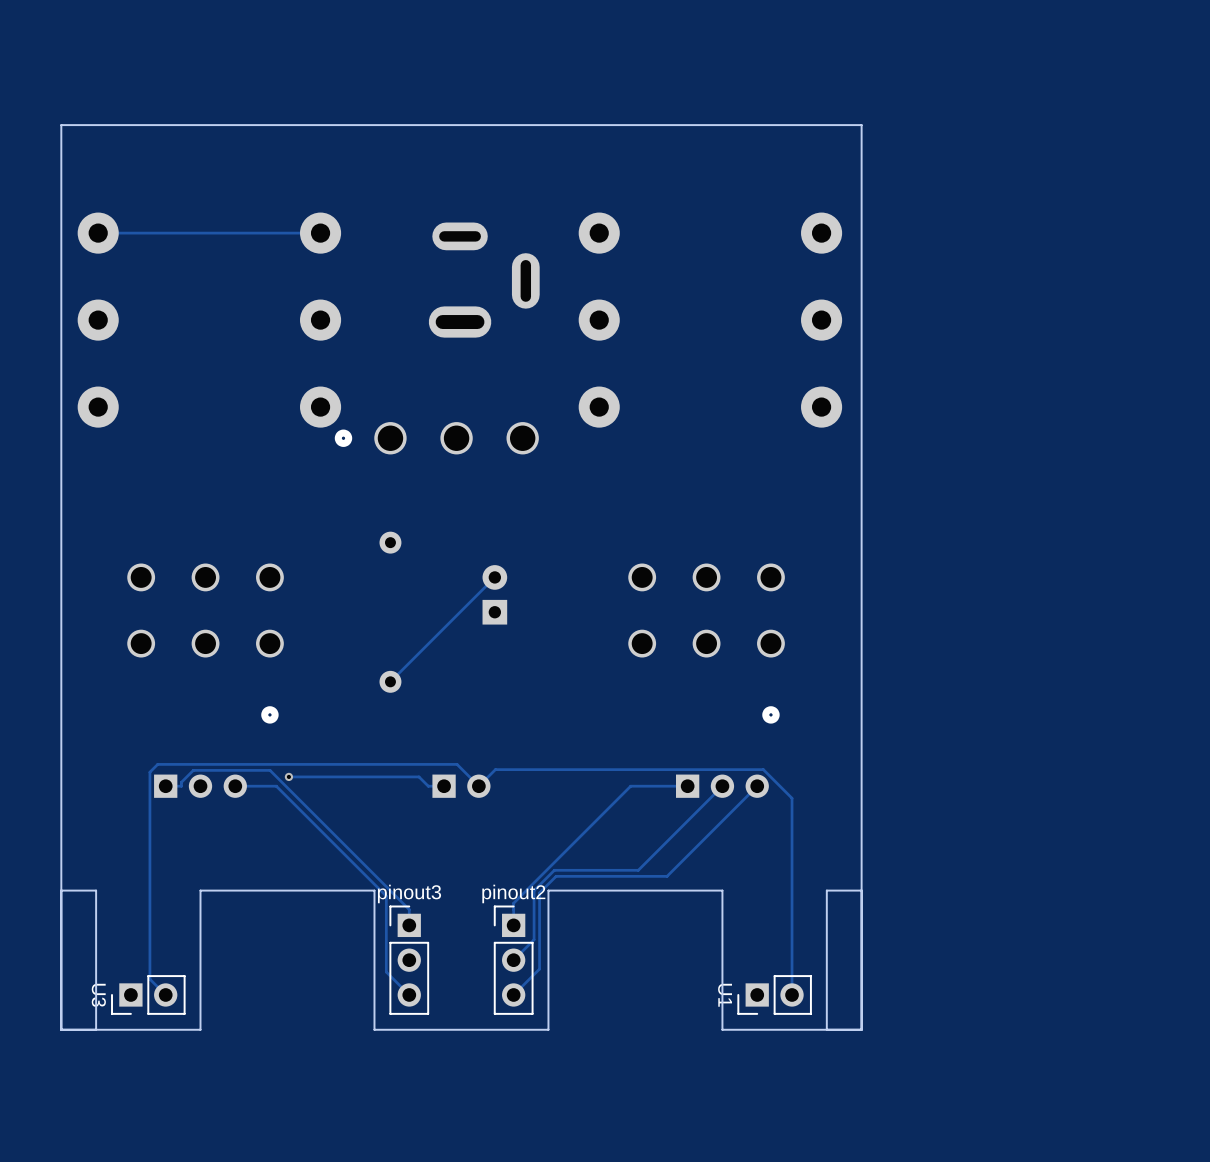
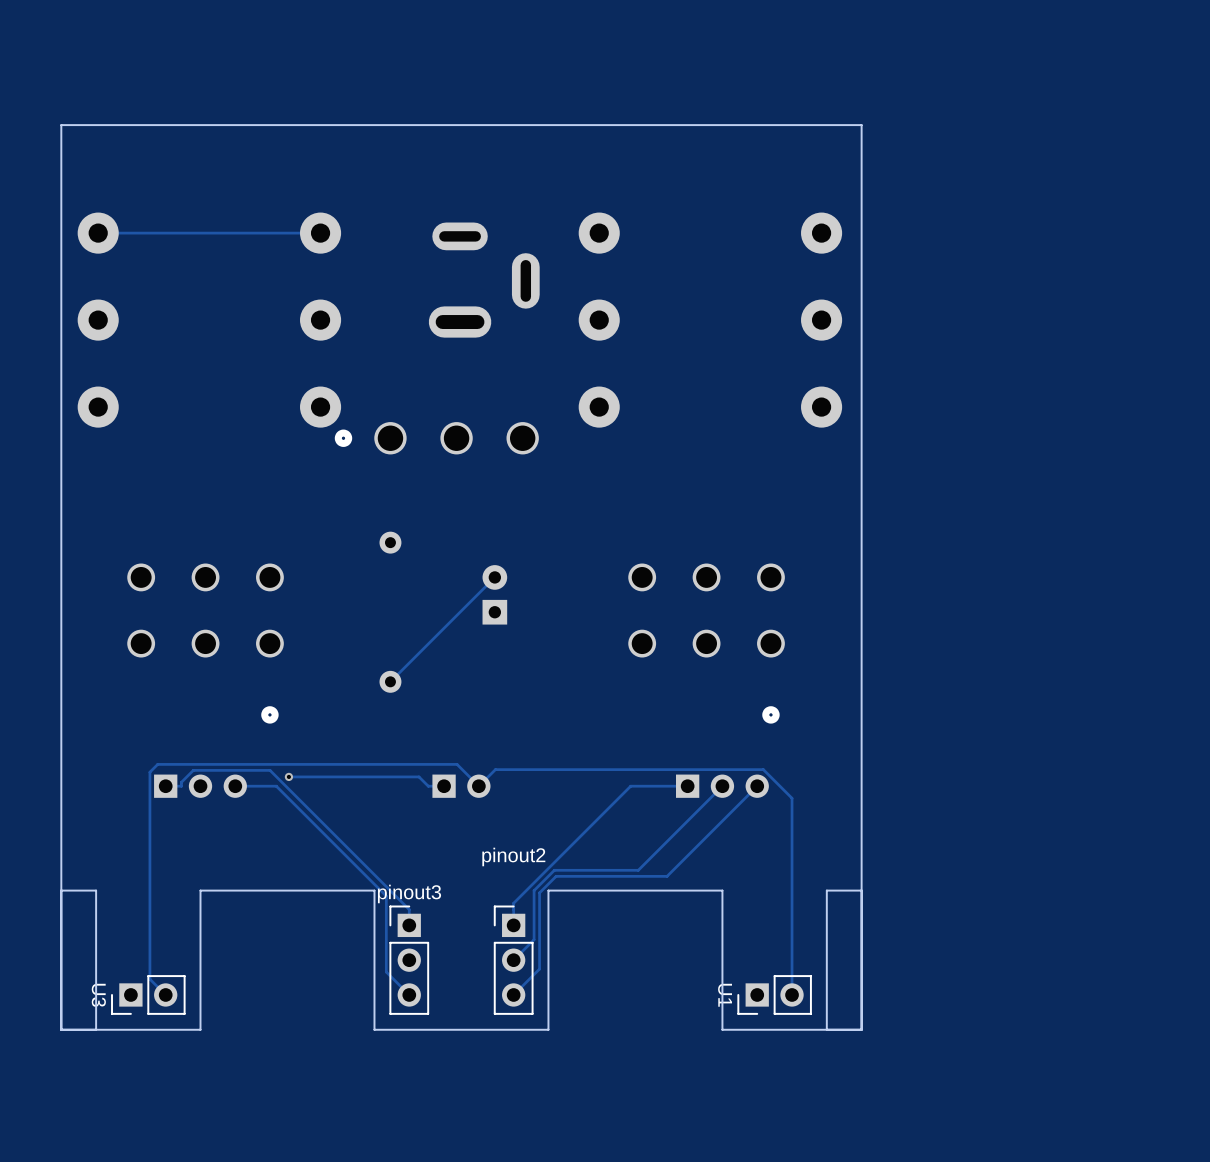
pinout2 name position: pinout2 (513, 893) -> pinout2 (513, 856)

